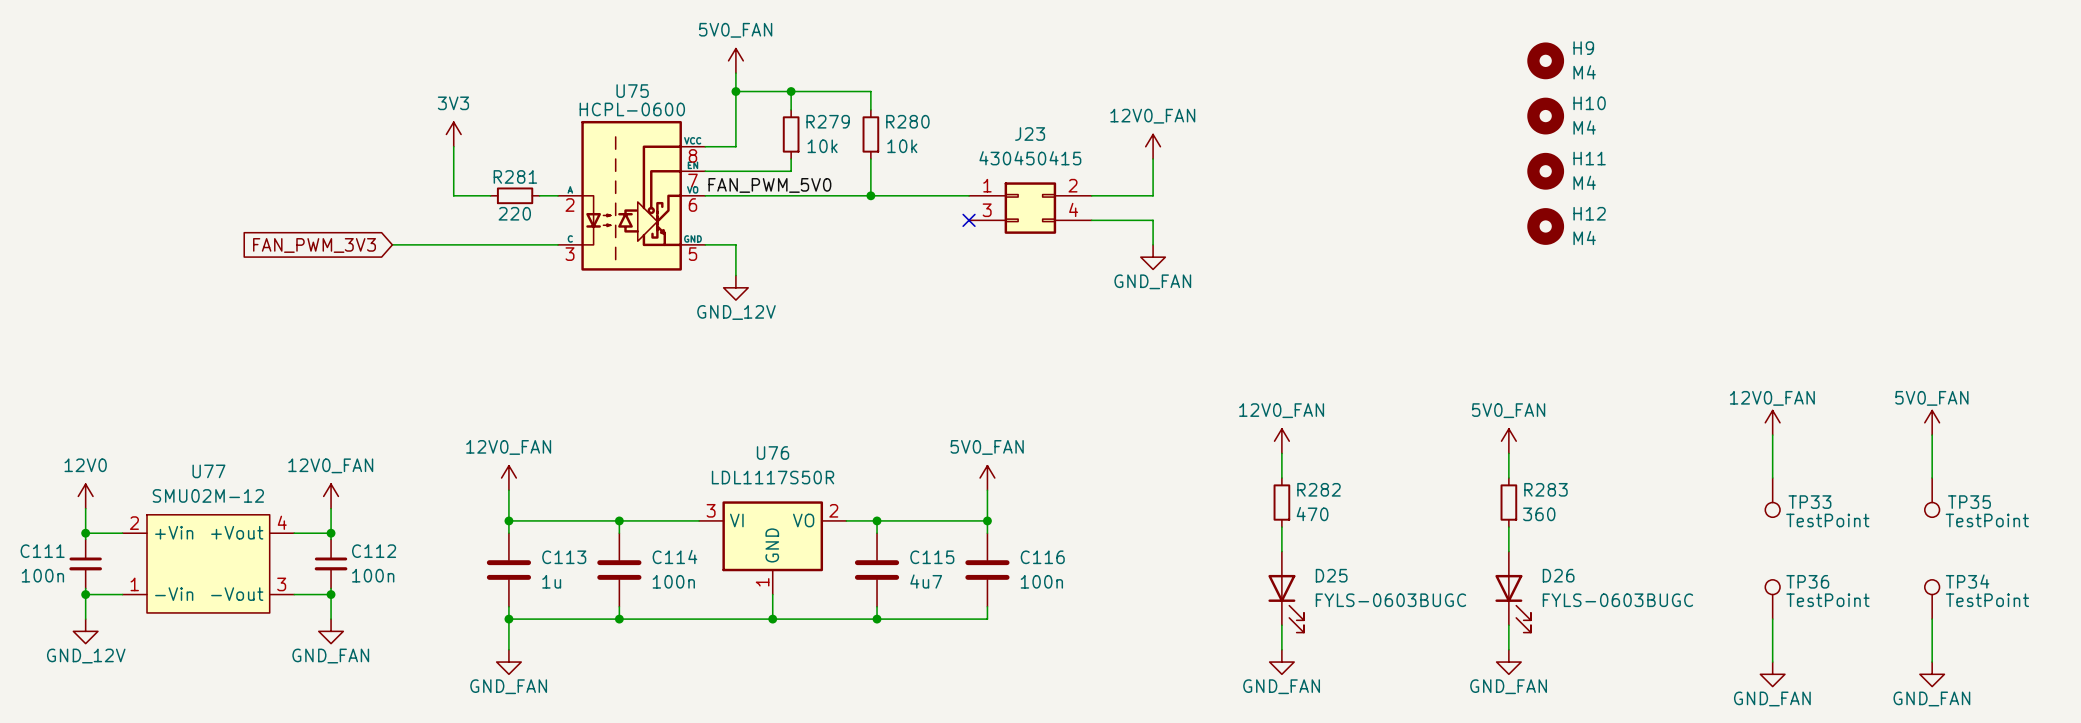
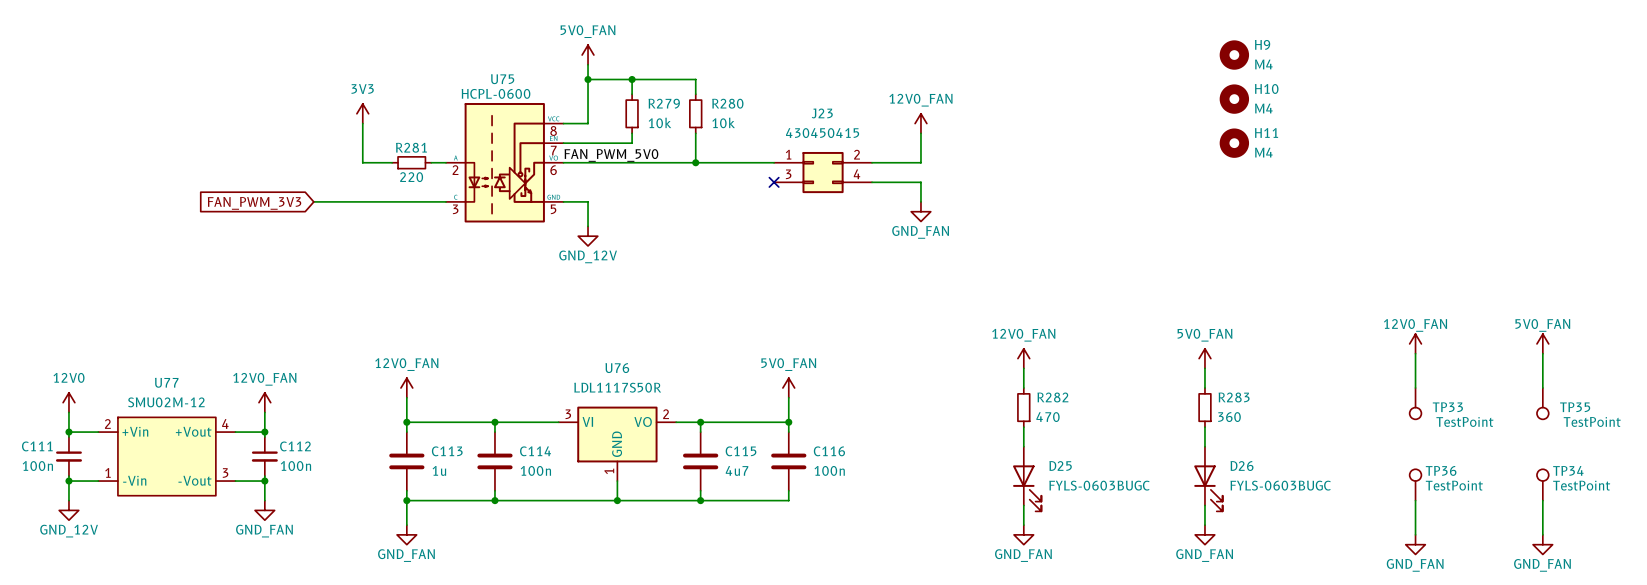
H12: M4 (1545, 226) -> none

